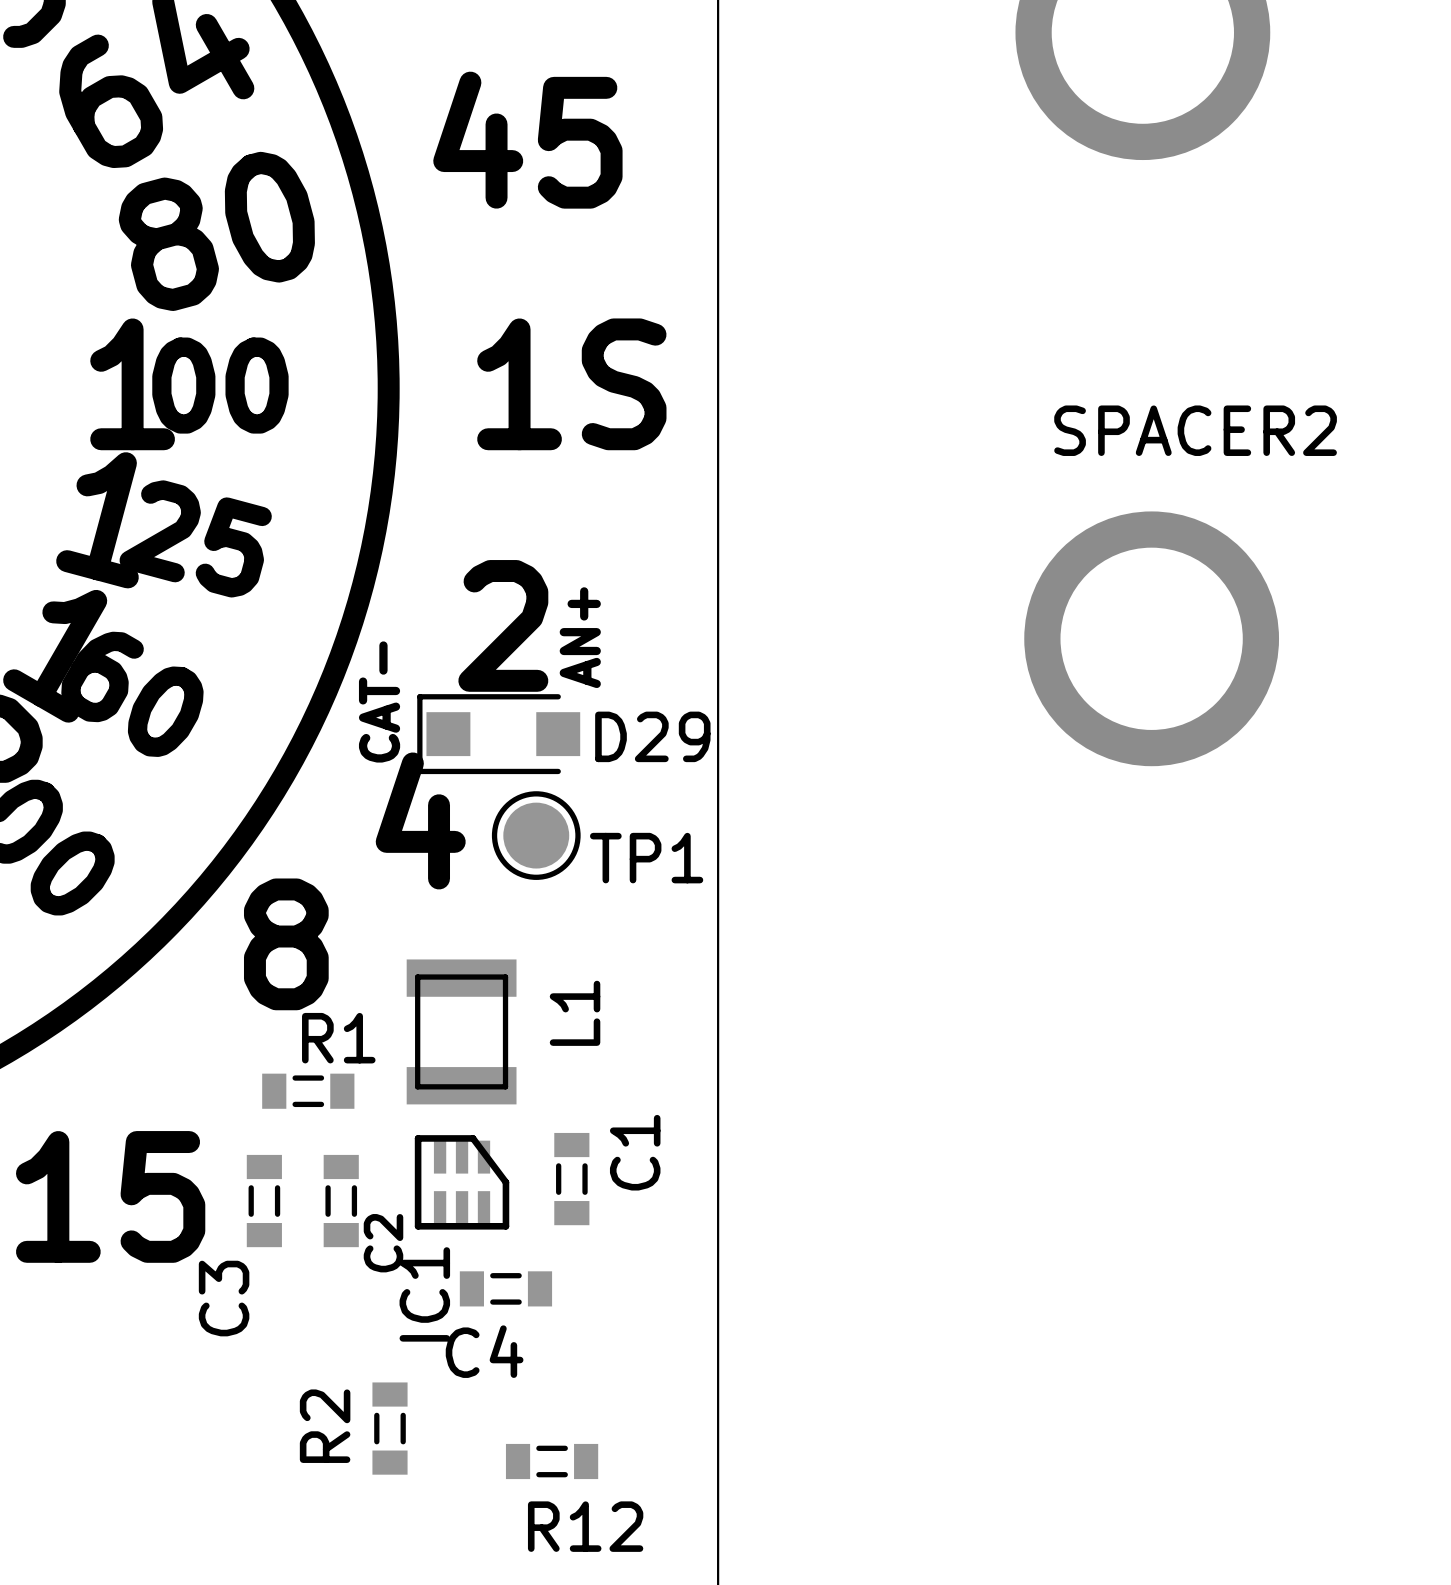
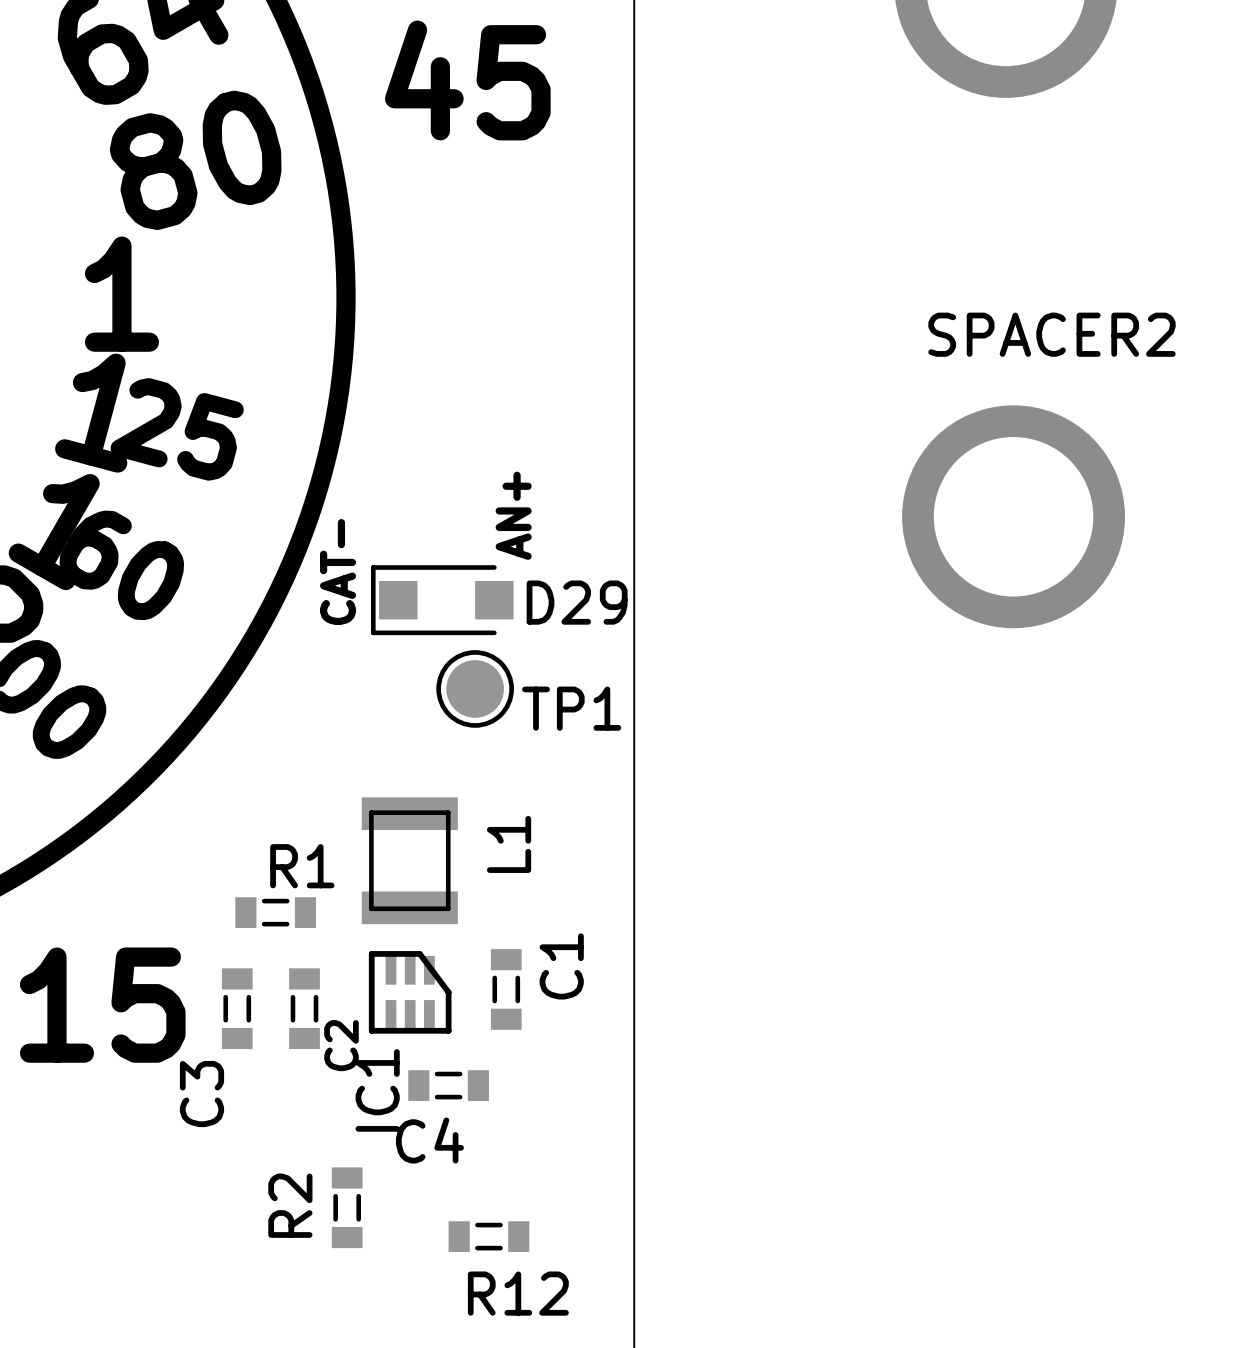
text: 1S (571, 384) -> none
text: 00 (220, 385) -> none
text: 2 (503, 625) -> none
text: 4 (420, 820) -> none
text: 8 (286, 944) -> none

